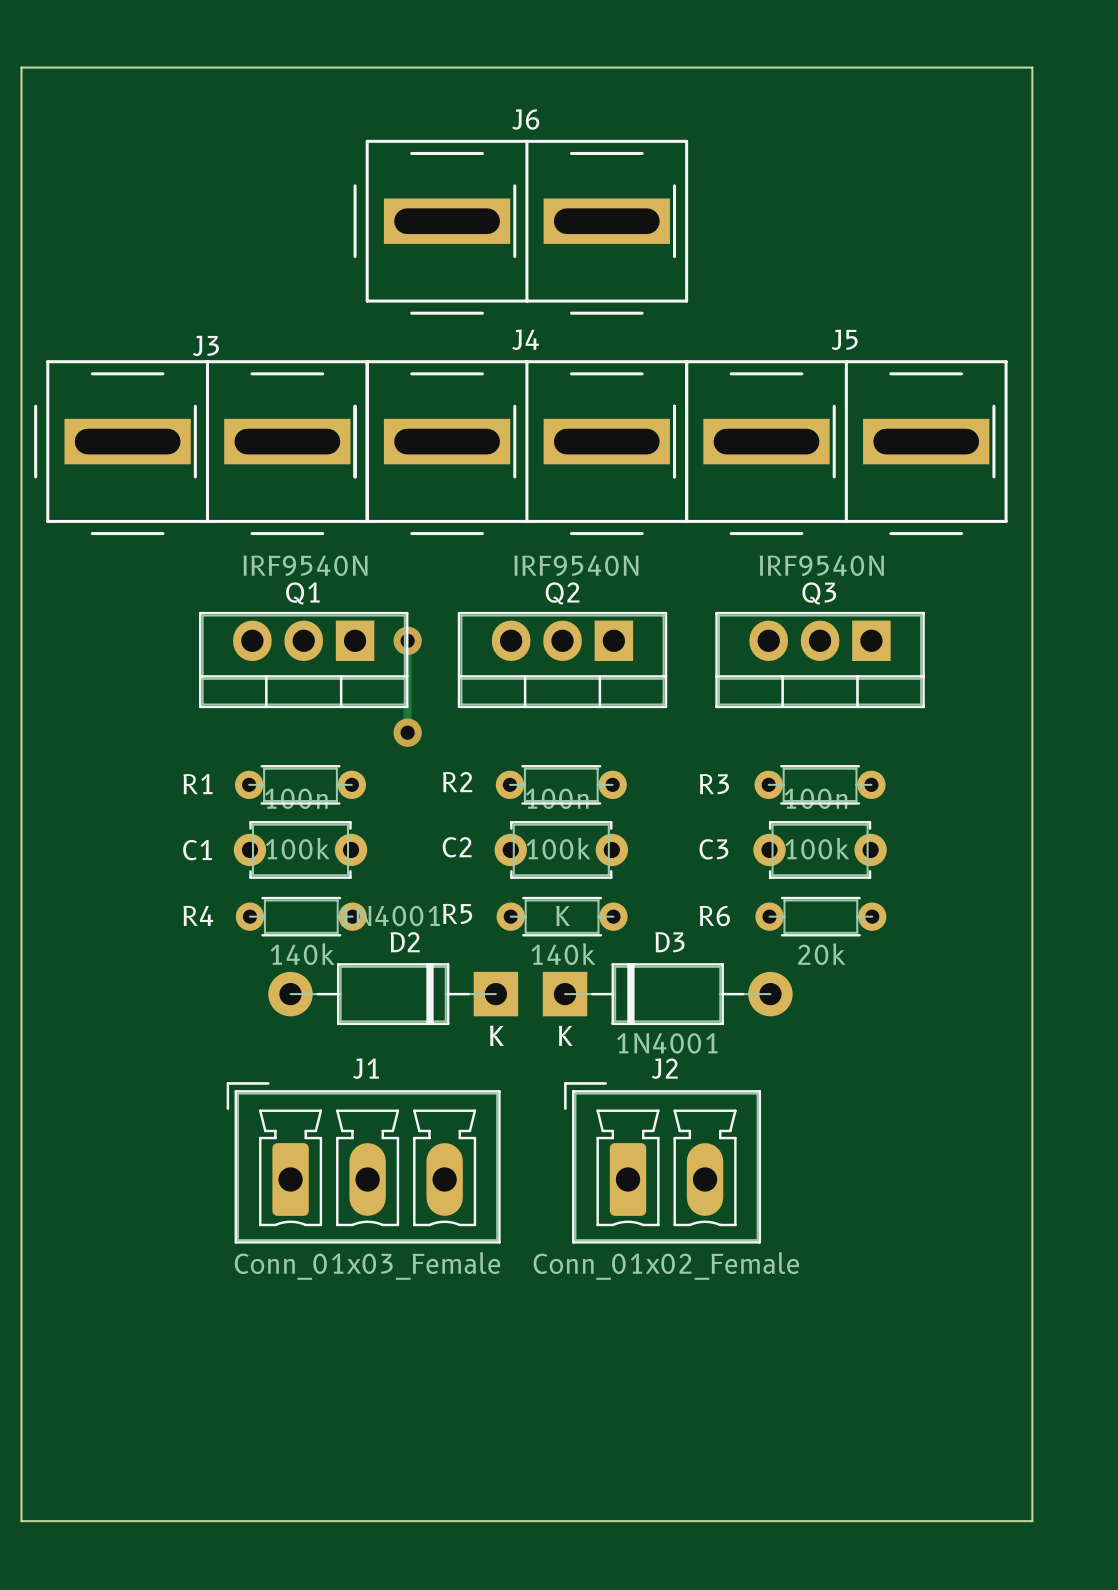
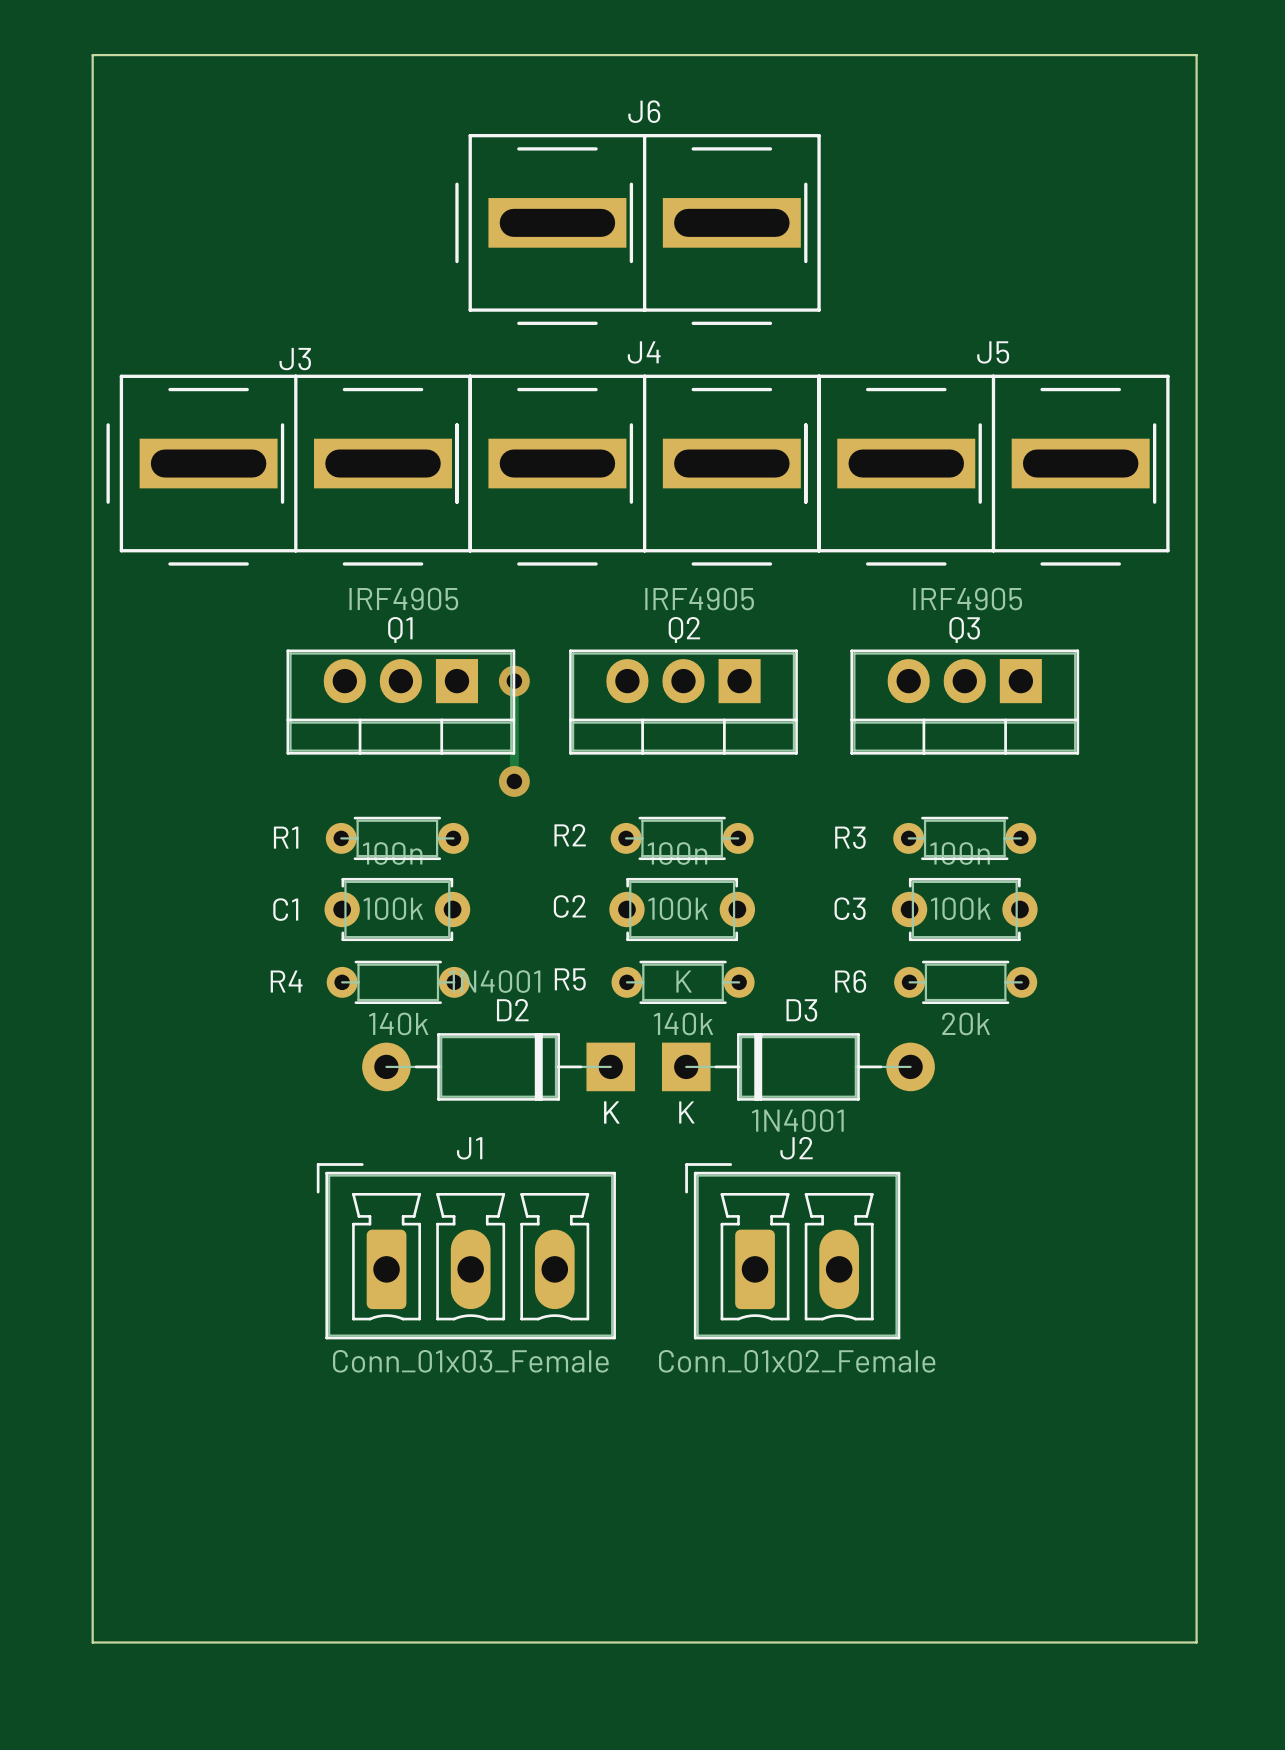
Q1 value: IRF9540N (305, 565) -> IRF4905 (403, 599)
Q2 value: IRF9540N (576, 565) -> IRF4905 (699, 599)
Q3 value: IRF9540N (821, 565) -> IRF4905 (967, 599)

